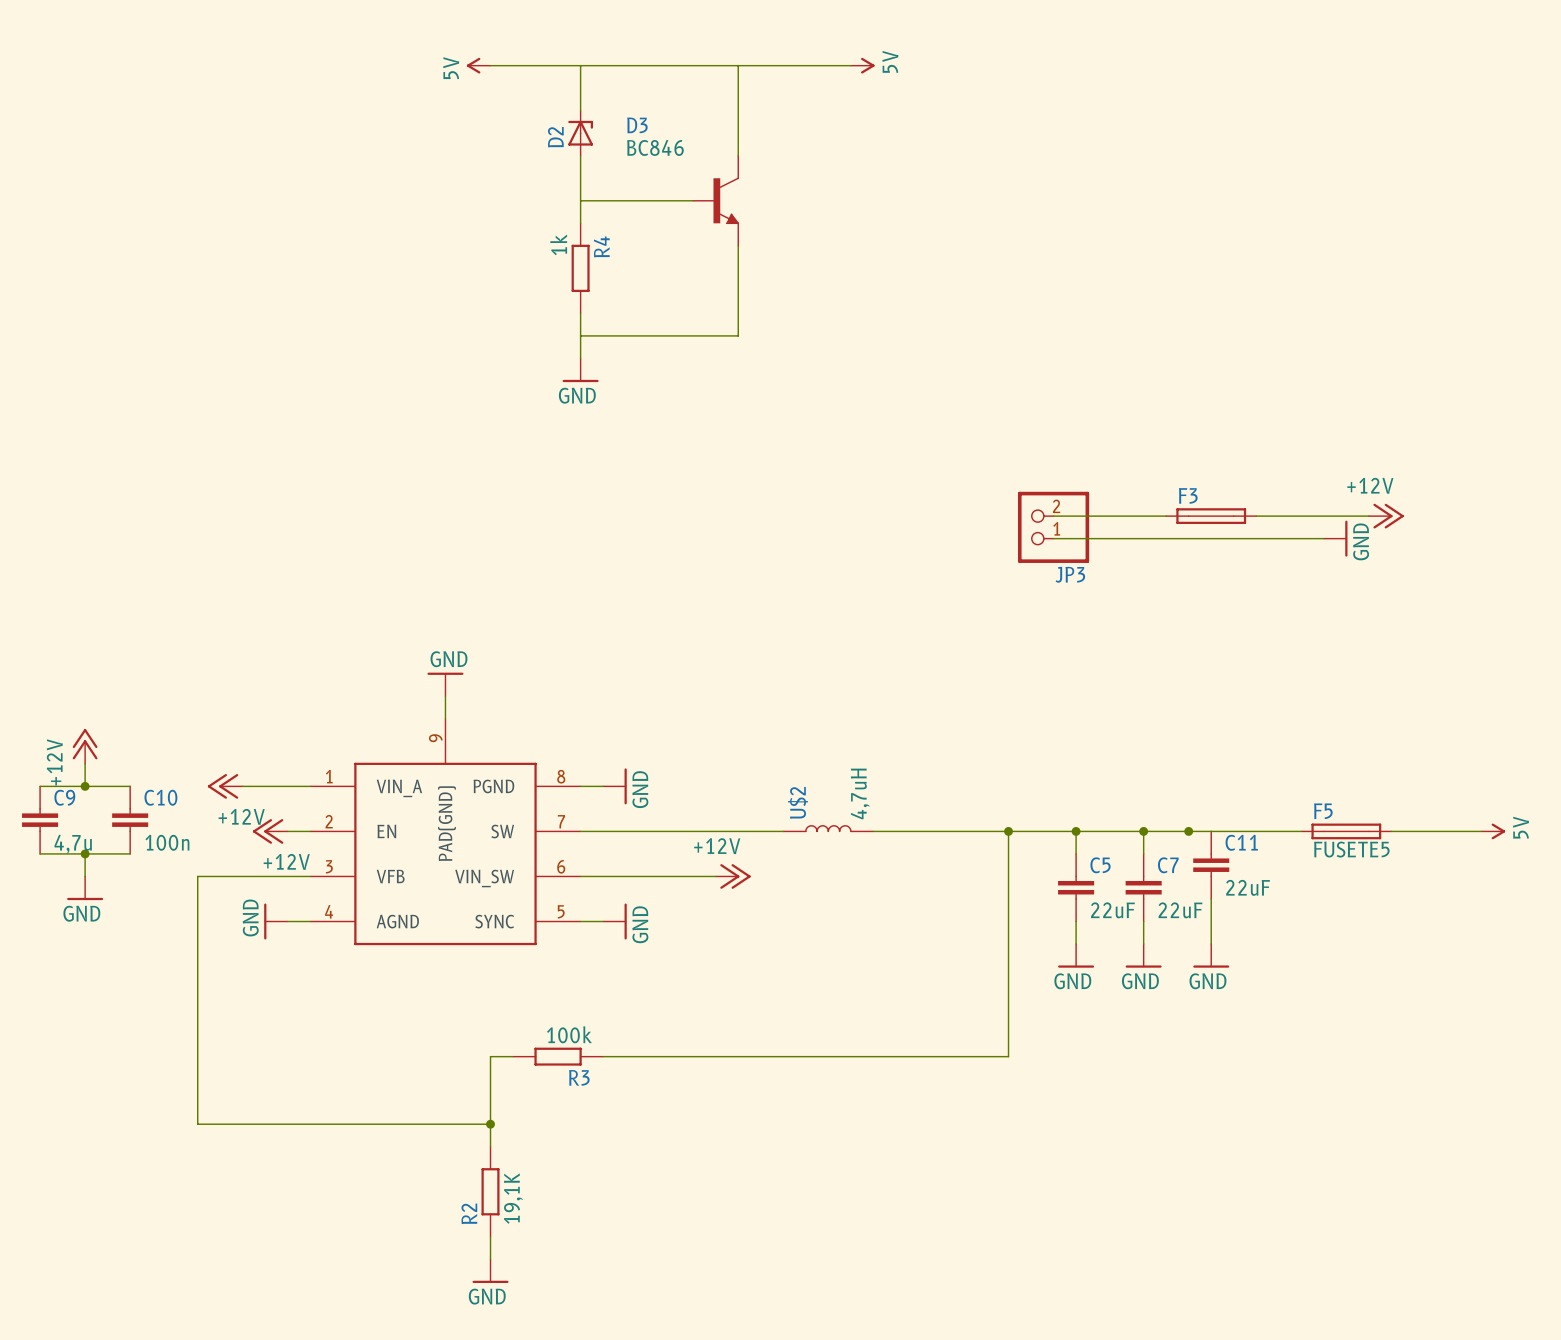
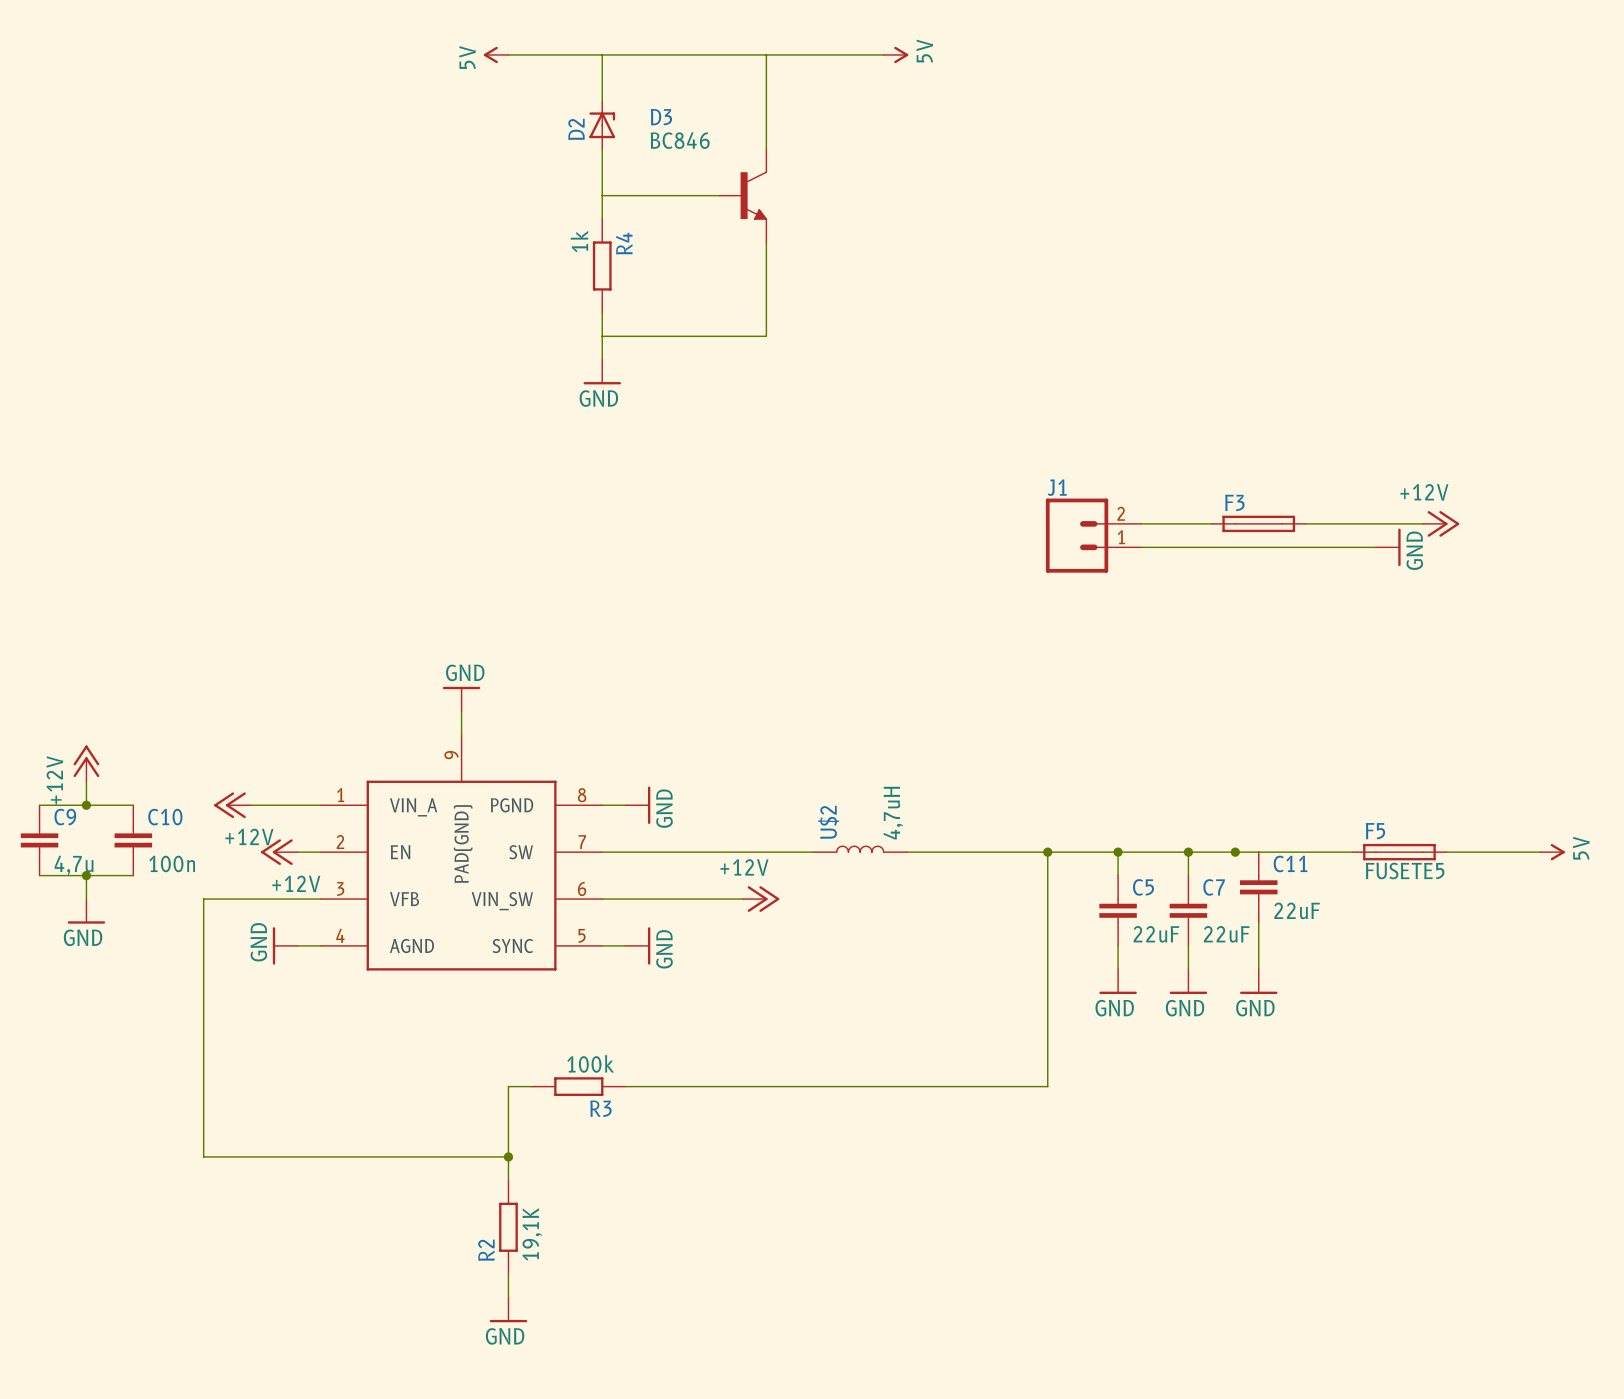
J1: none -> (1093, 535)
JP3: (1053, 527) -> none

